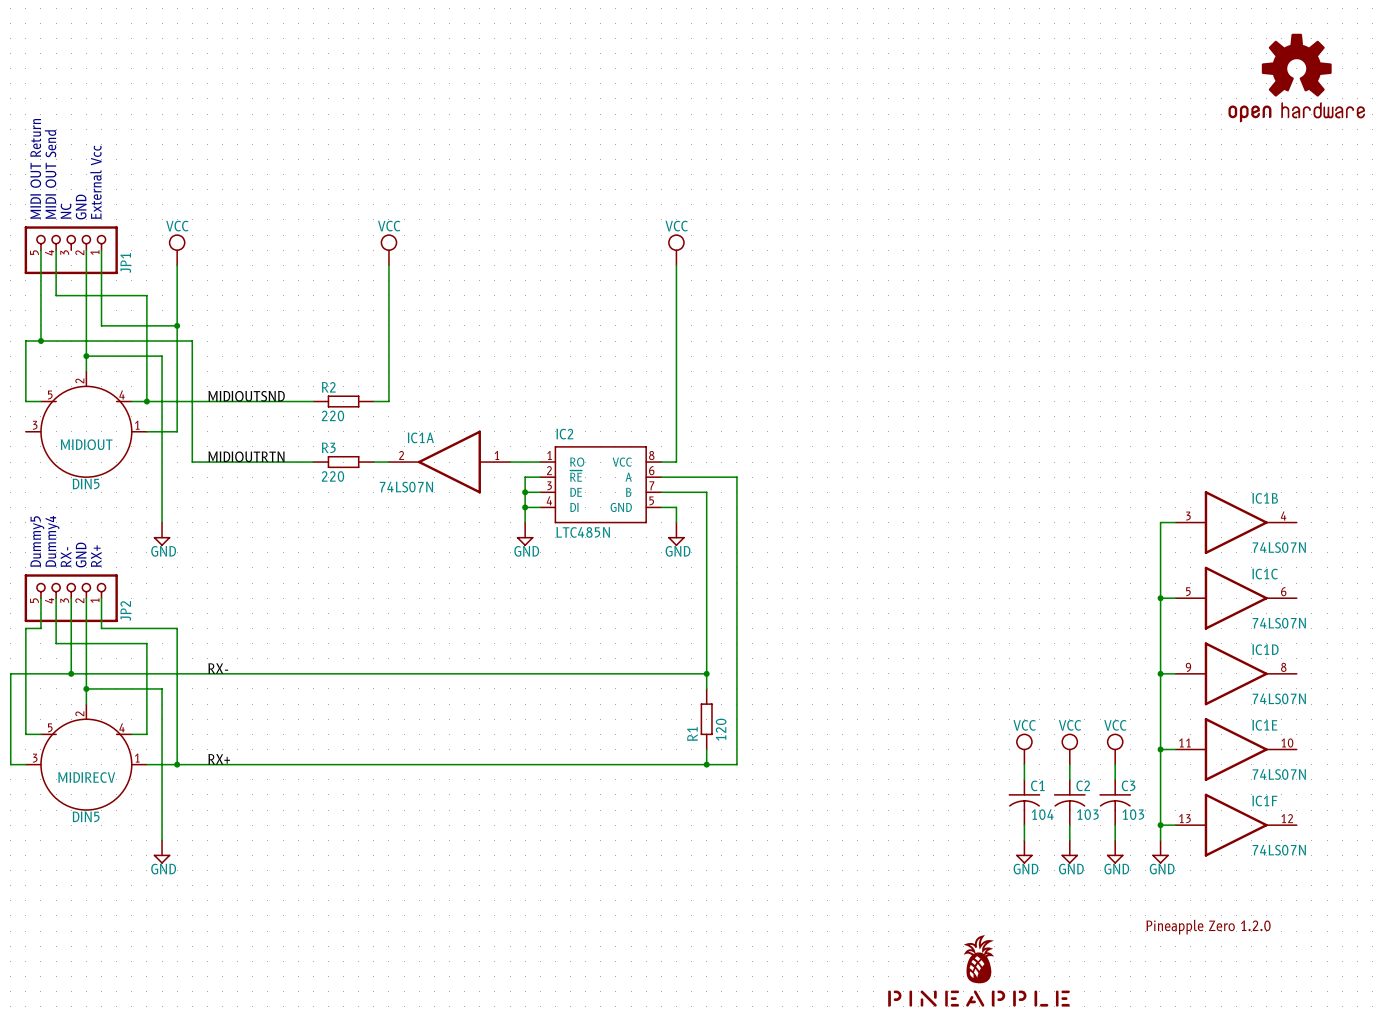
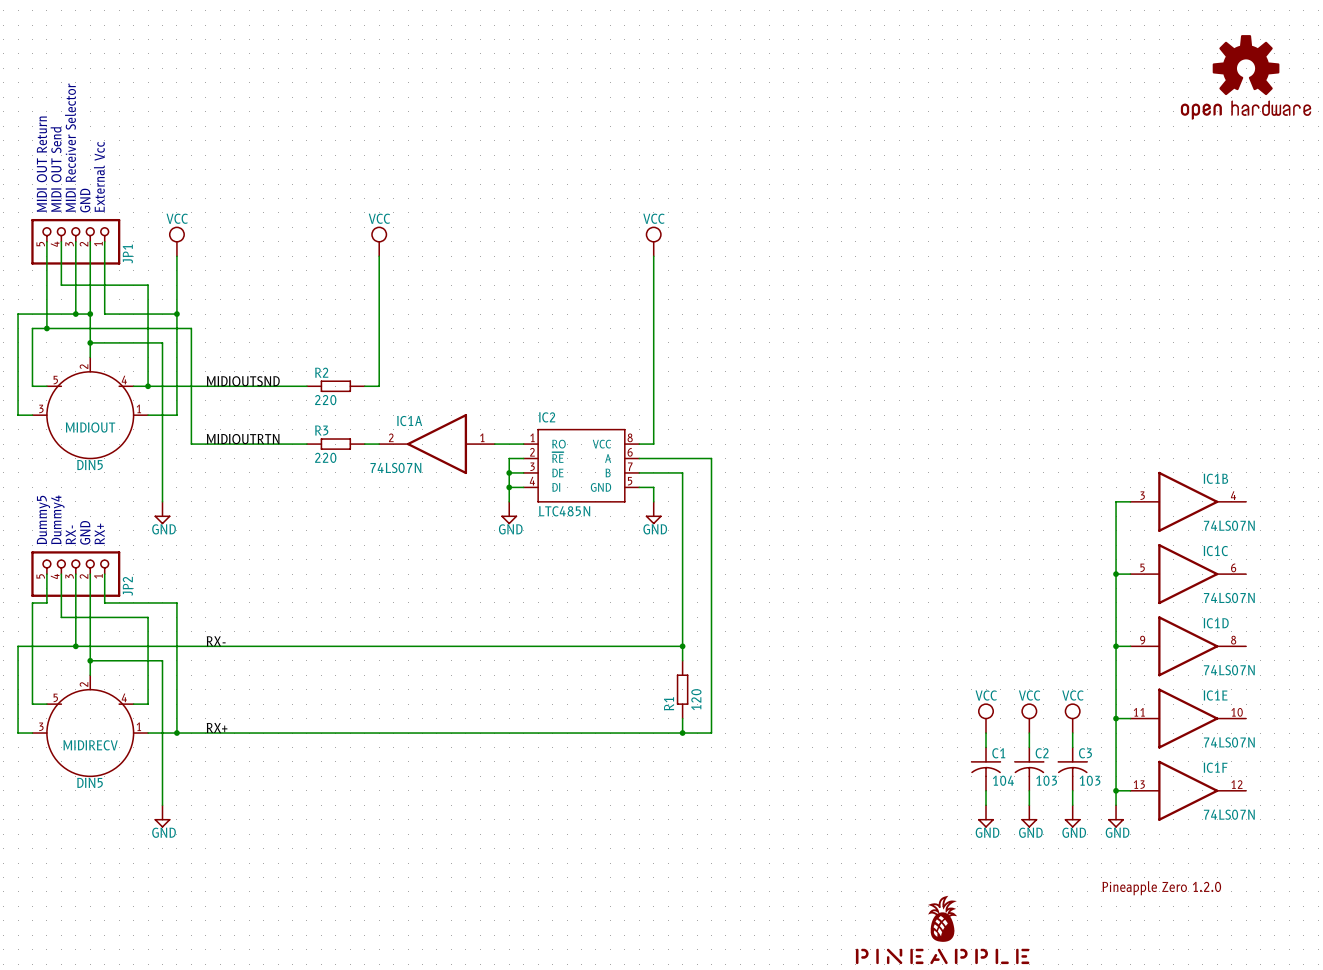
text: NC (66, 211) -> MIDI Receiver Selector (70, 147)
wire: none -> (75, 241) (75, 314)
junction: none -> (75, 314)
wire: none -> (90, 314) (18, 314) (18, 415) (32, 415)
junction: none -> (90, 314)

